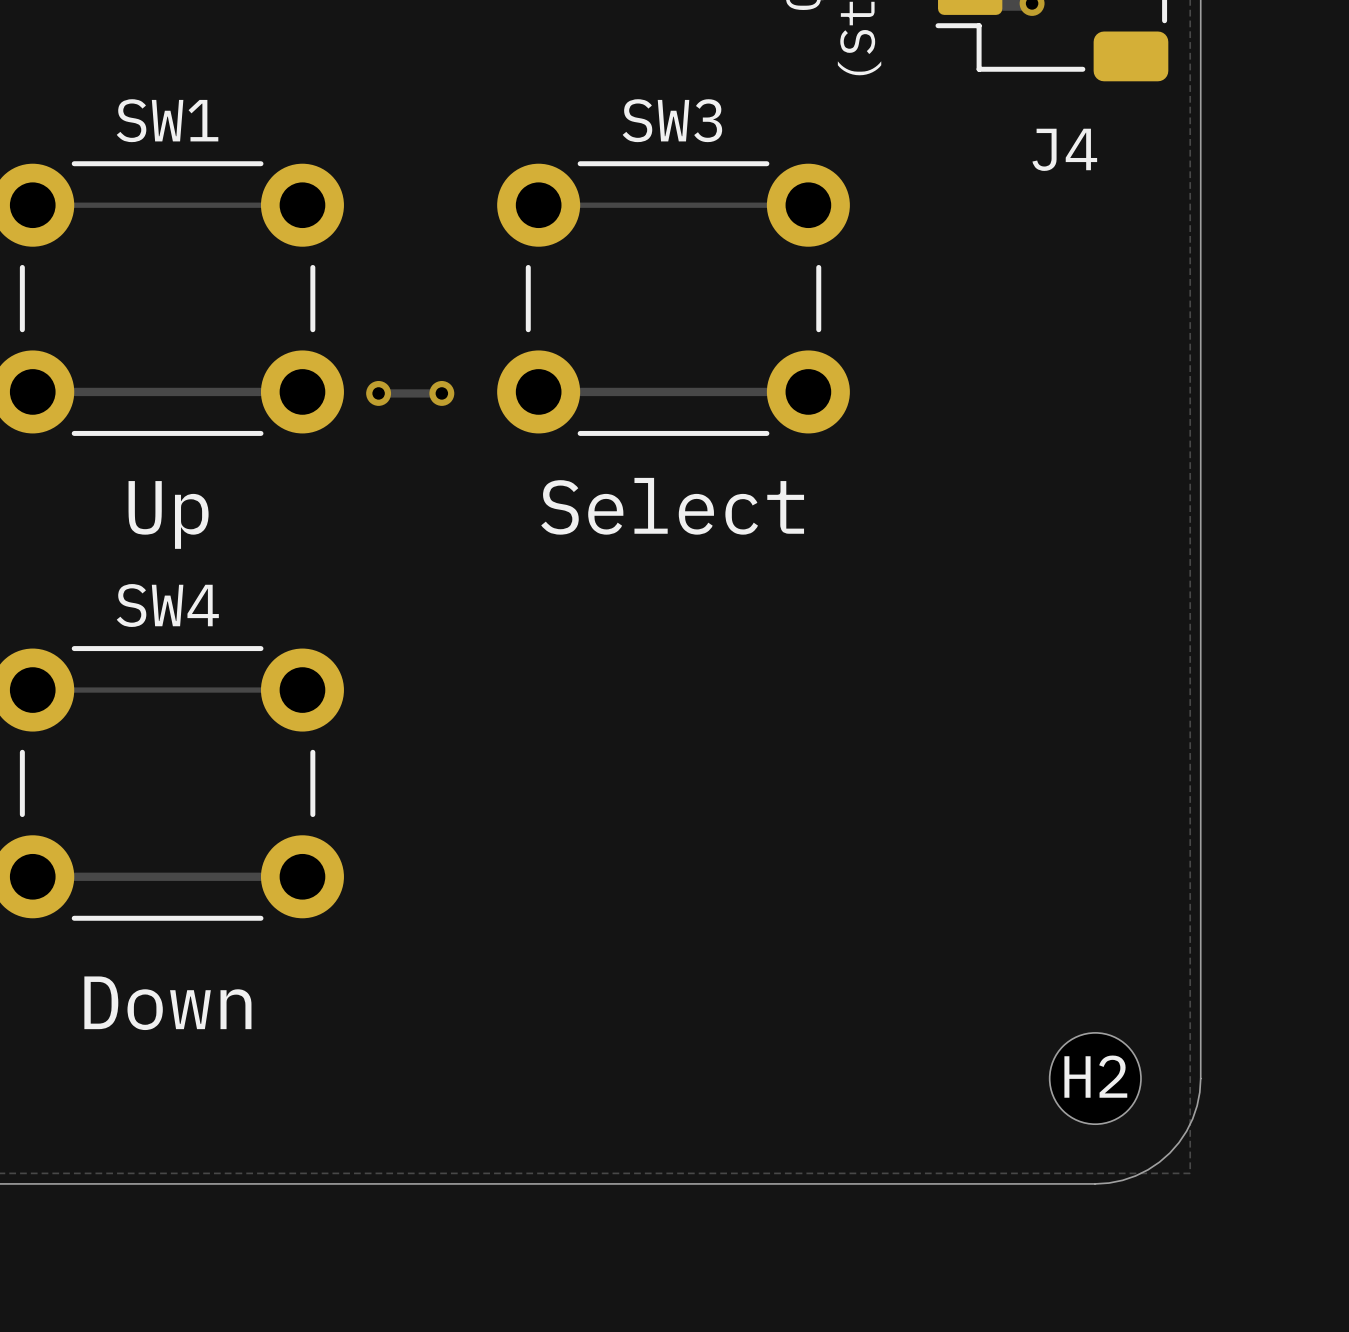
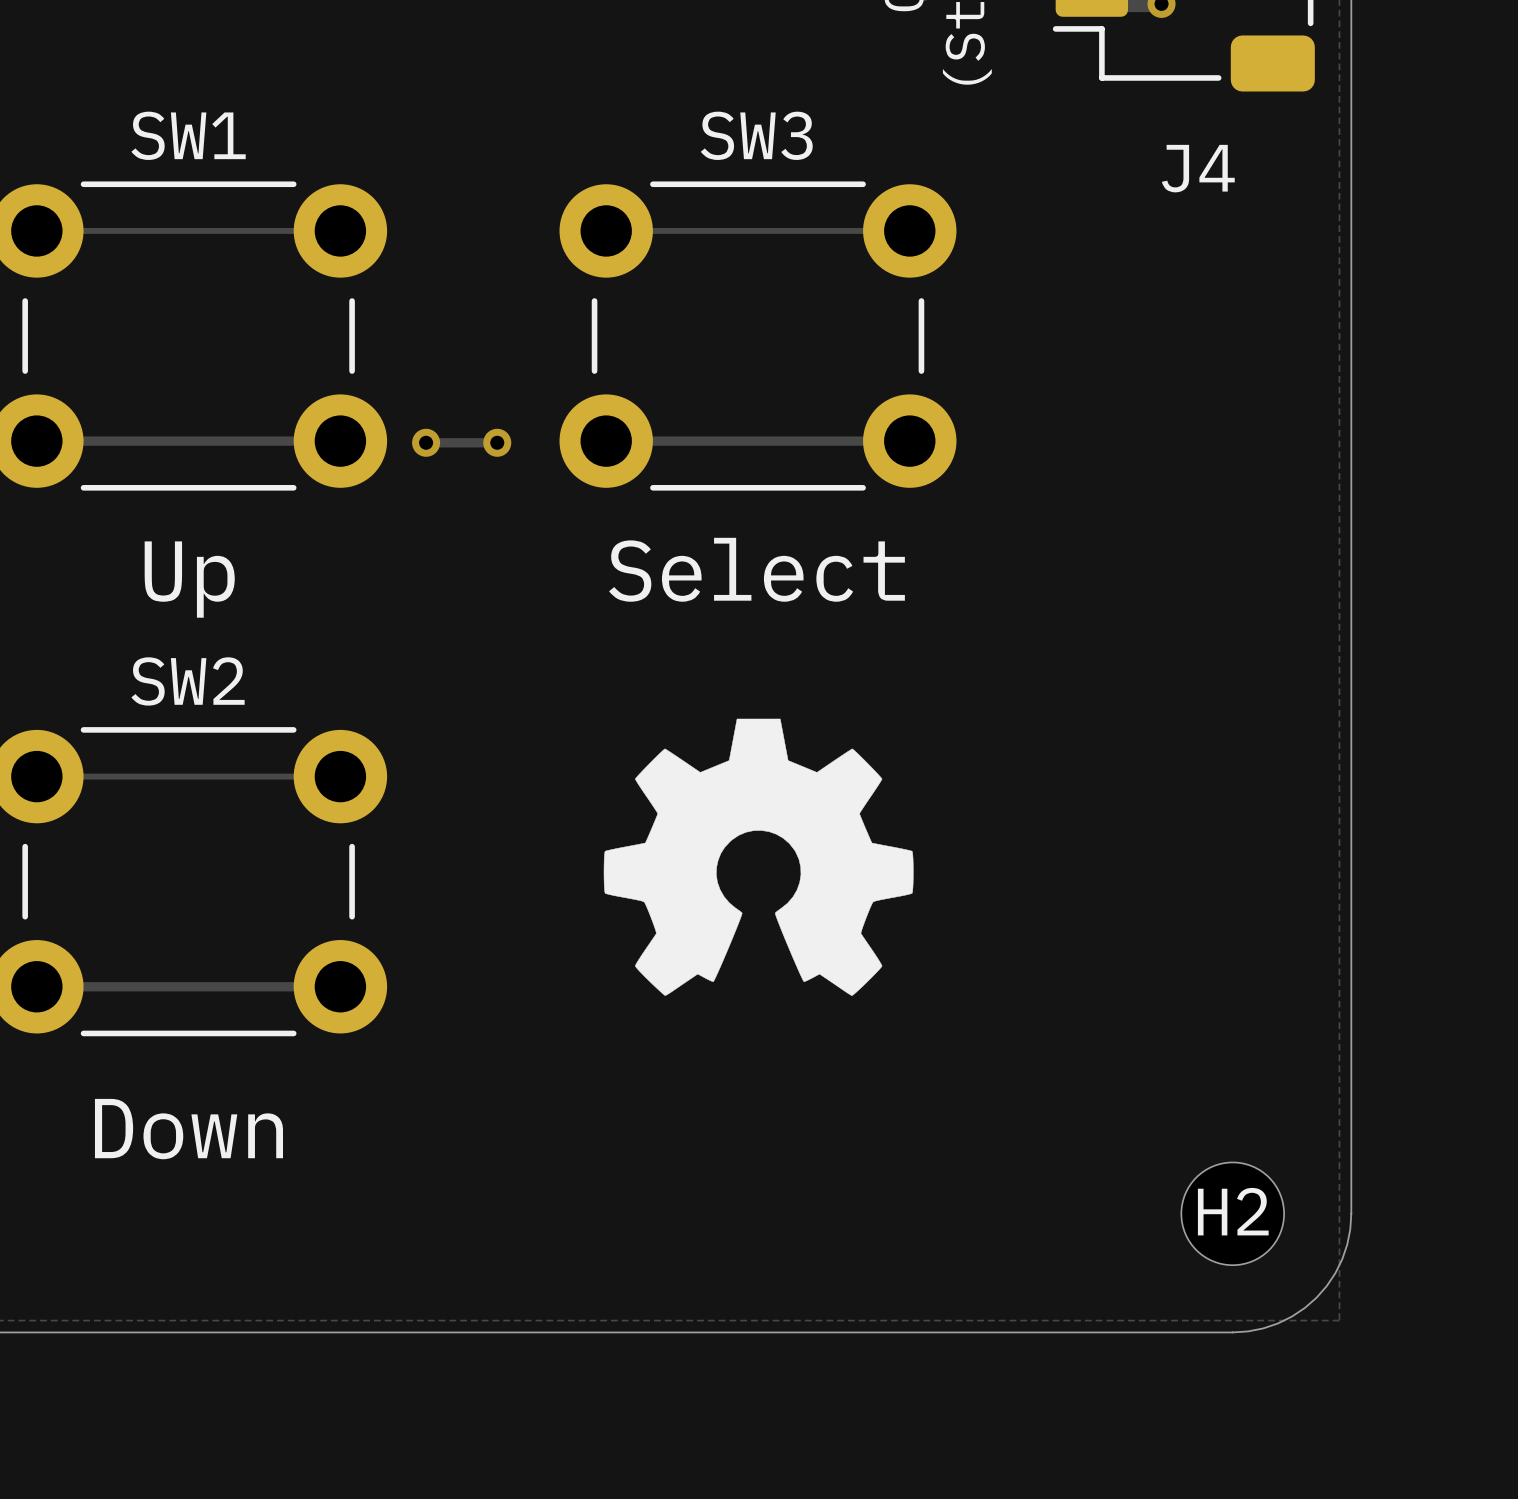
SW4 name: SW4 (167, 605) -> SW2 (188, 681)
drawing: none -> [603, 718, 914, 996]

